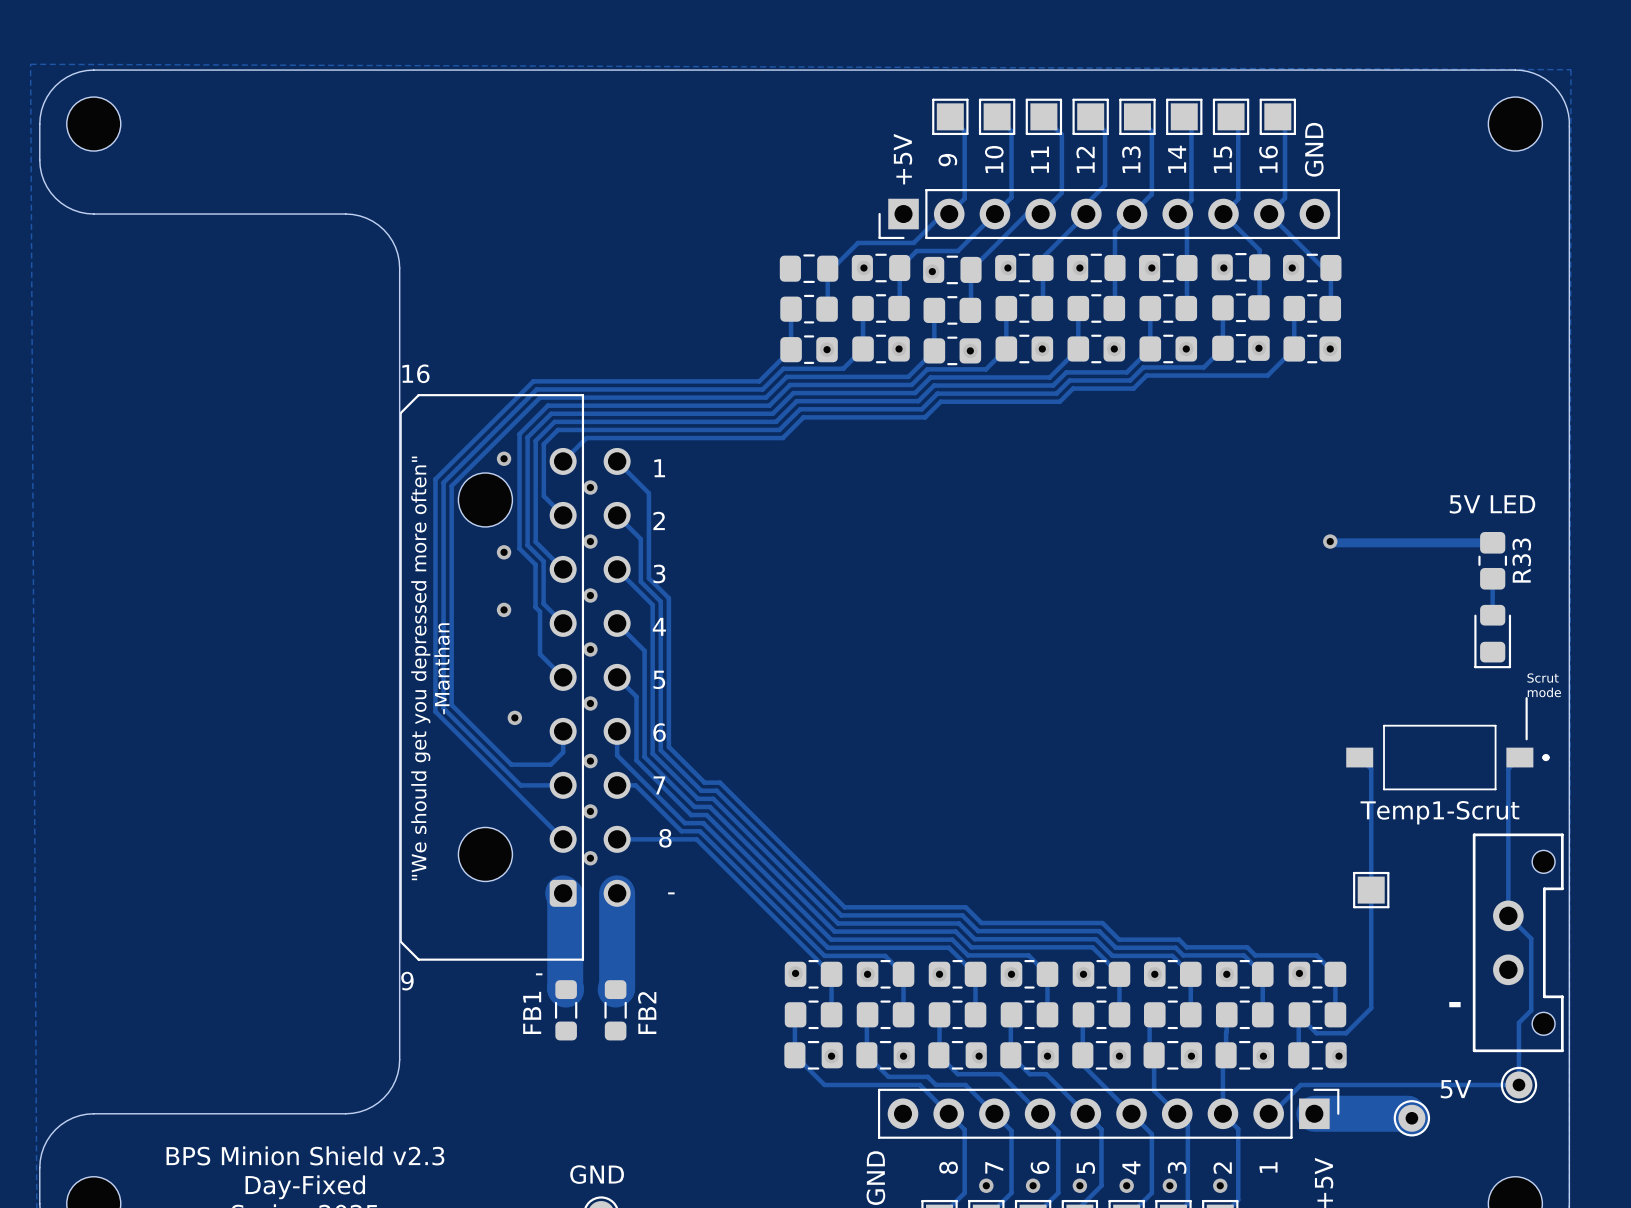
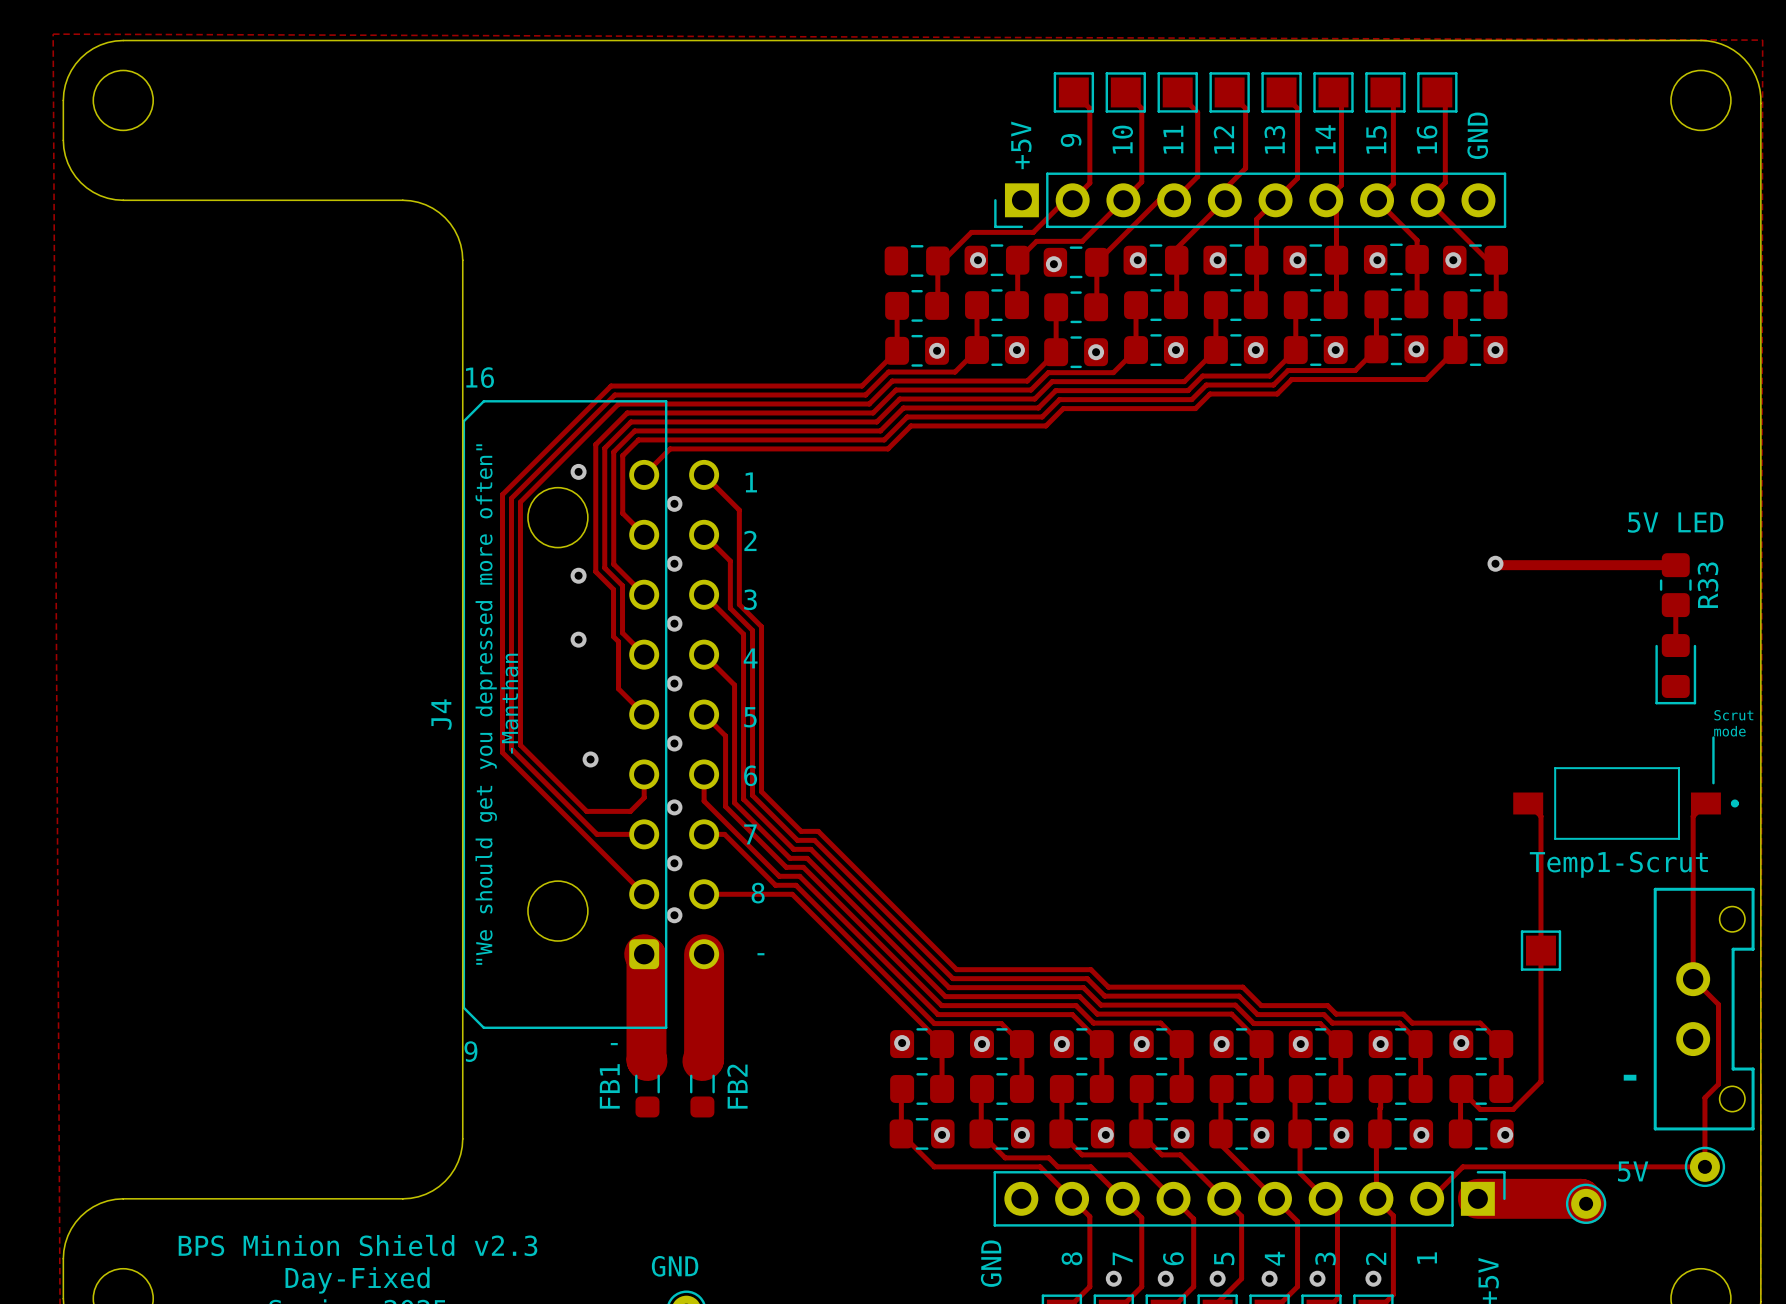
J4 name: none -> J4 (441, 714)

